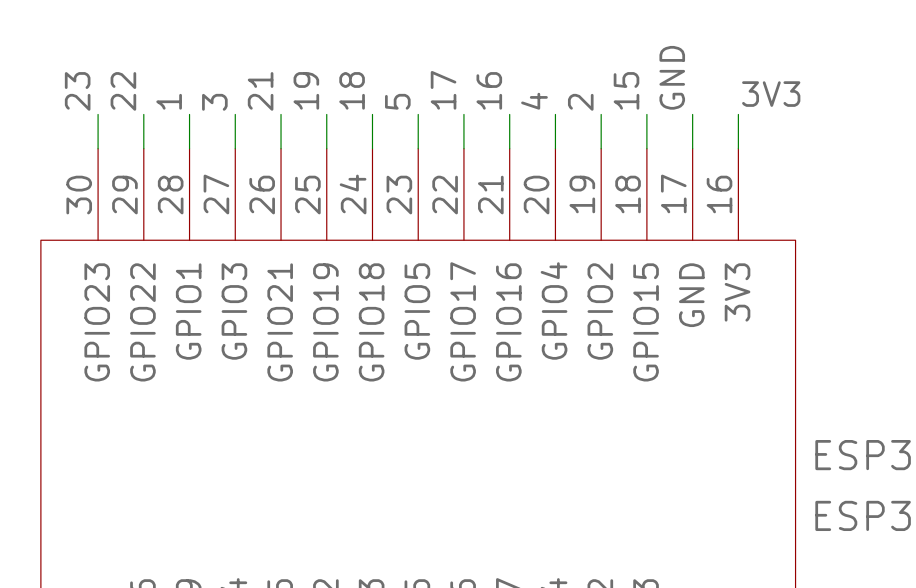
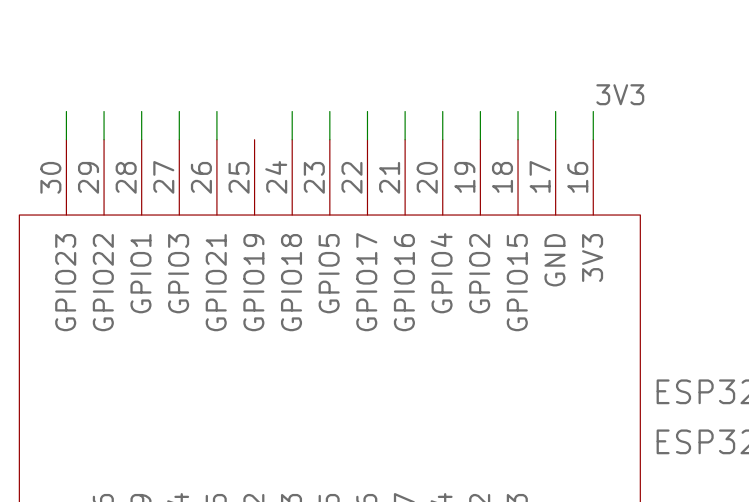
label: GND (672, 77) -> none
label: 19 (306, 90) -> none
label: 18 (352, 90) -> none
label: 17 (443, 90) -> none
label: 16 (489, 90) -> none
label: 15 (626, 90) -> none
label: 23 (77, 91) -> none
label: 22 (123, 91) -> none
label: 21 (260, 91) -> none
label: 1 (169, 101) -> none
label: 5 (397, 101) -> none
label: 4 (534, 101) -> none
label: 3 (214, 102) -> none
label: 2 (580, 102) -> none
wire: (326, 114) (326, 148) -> none

